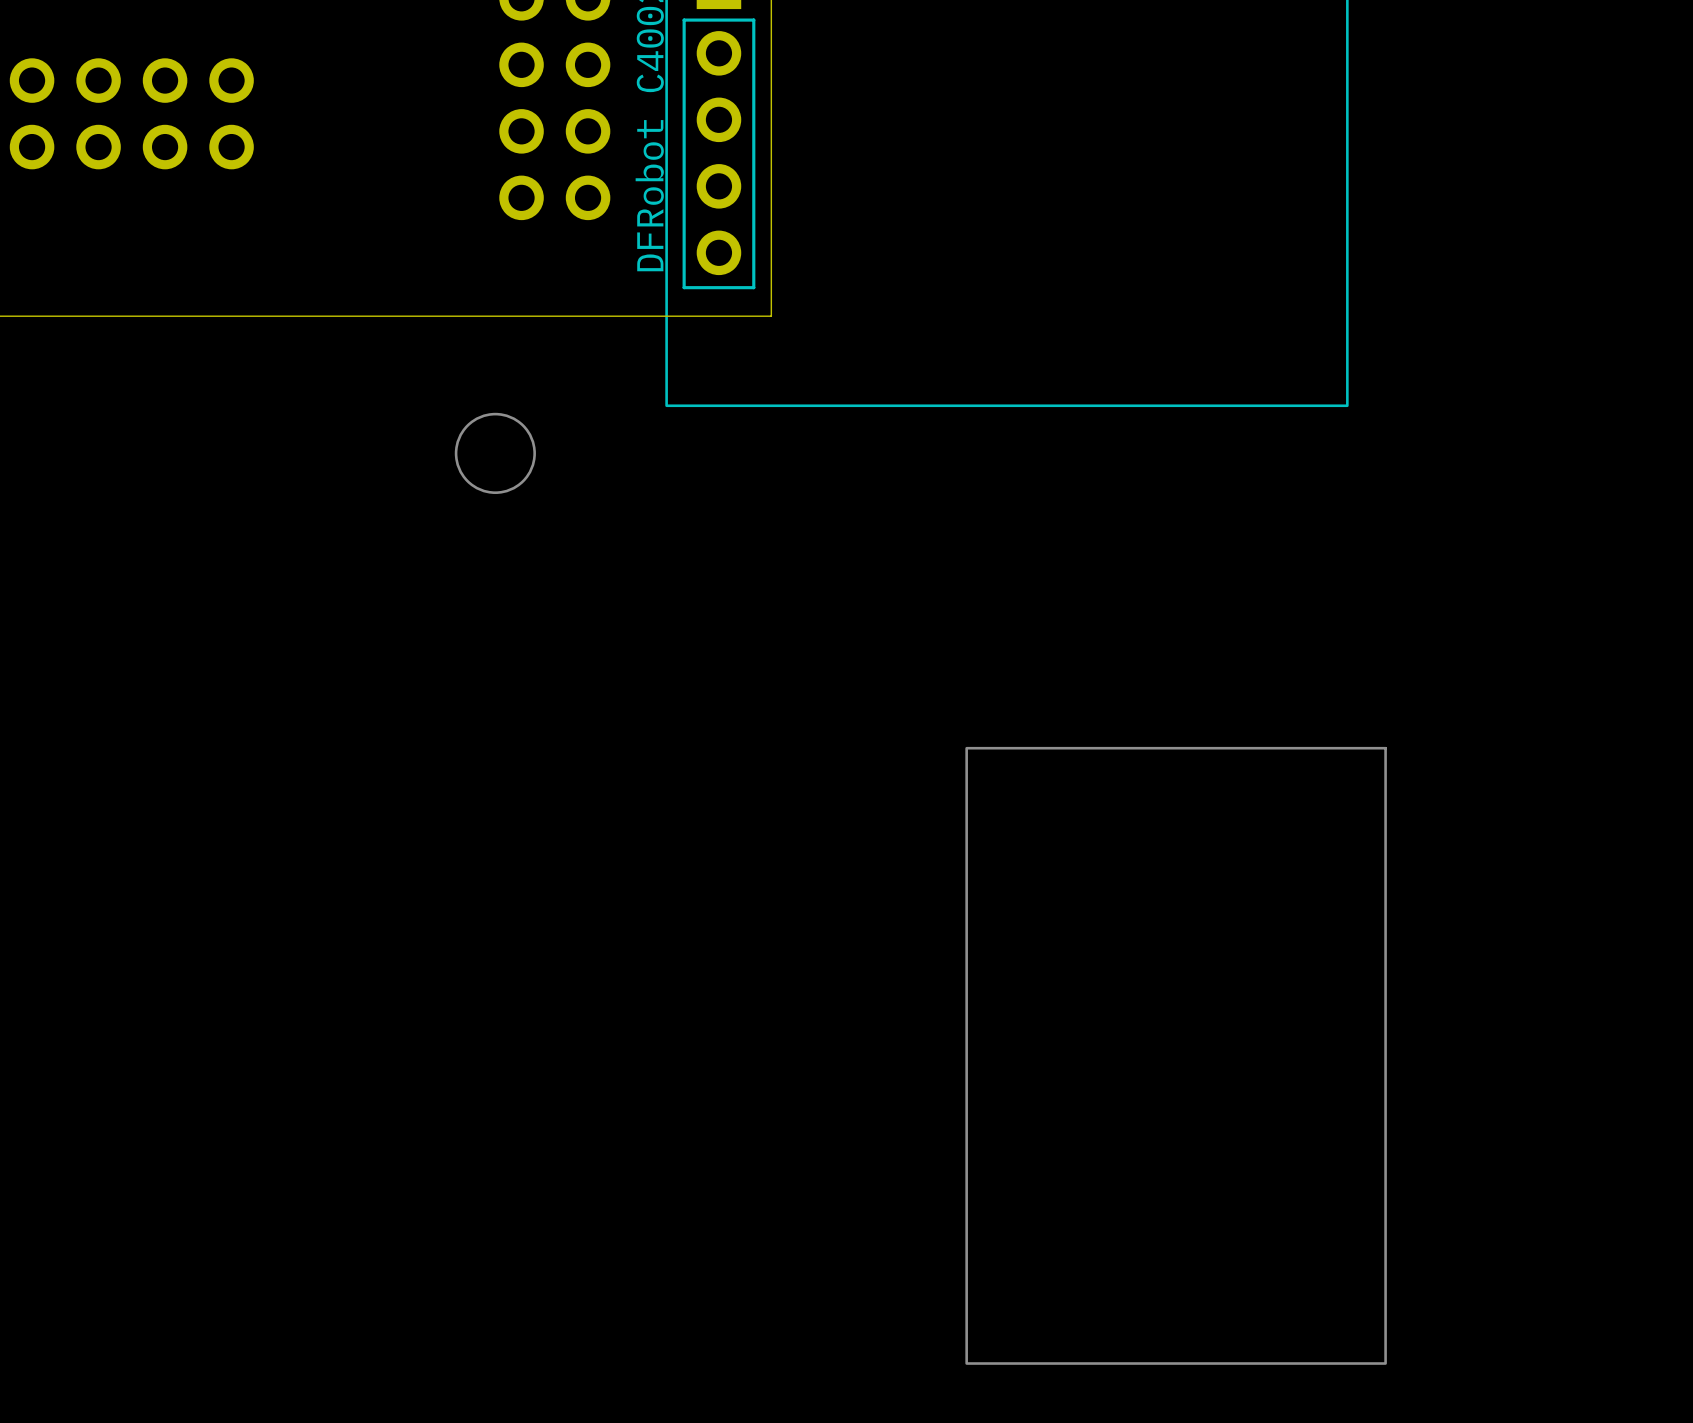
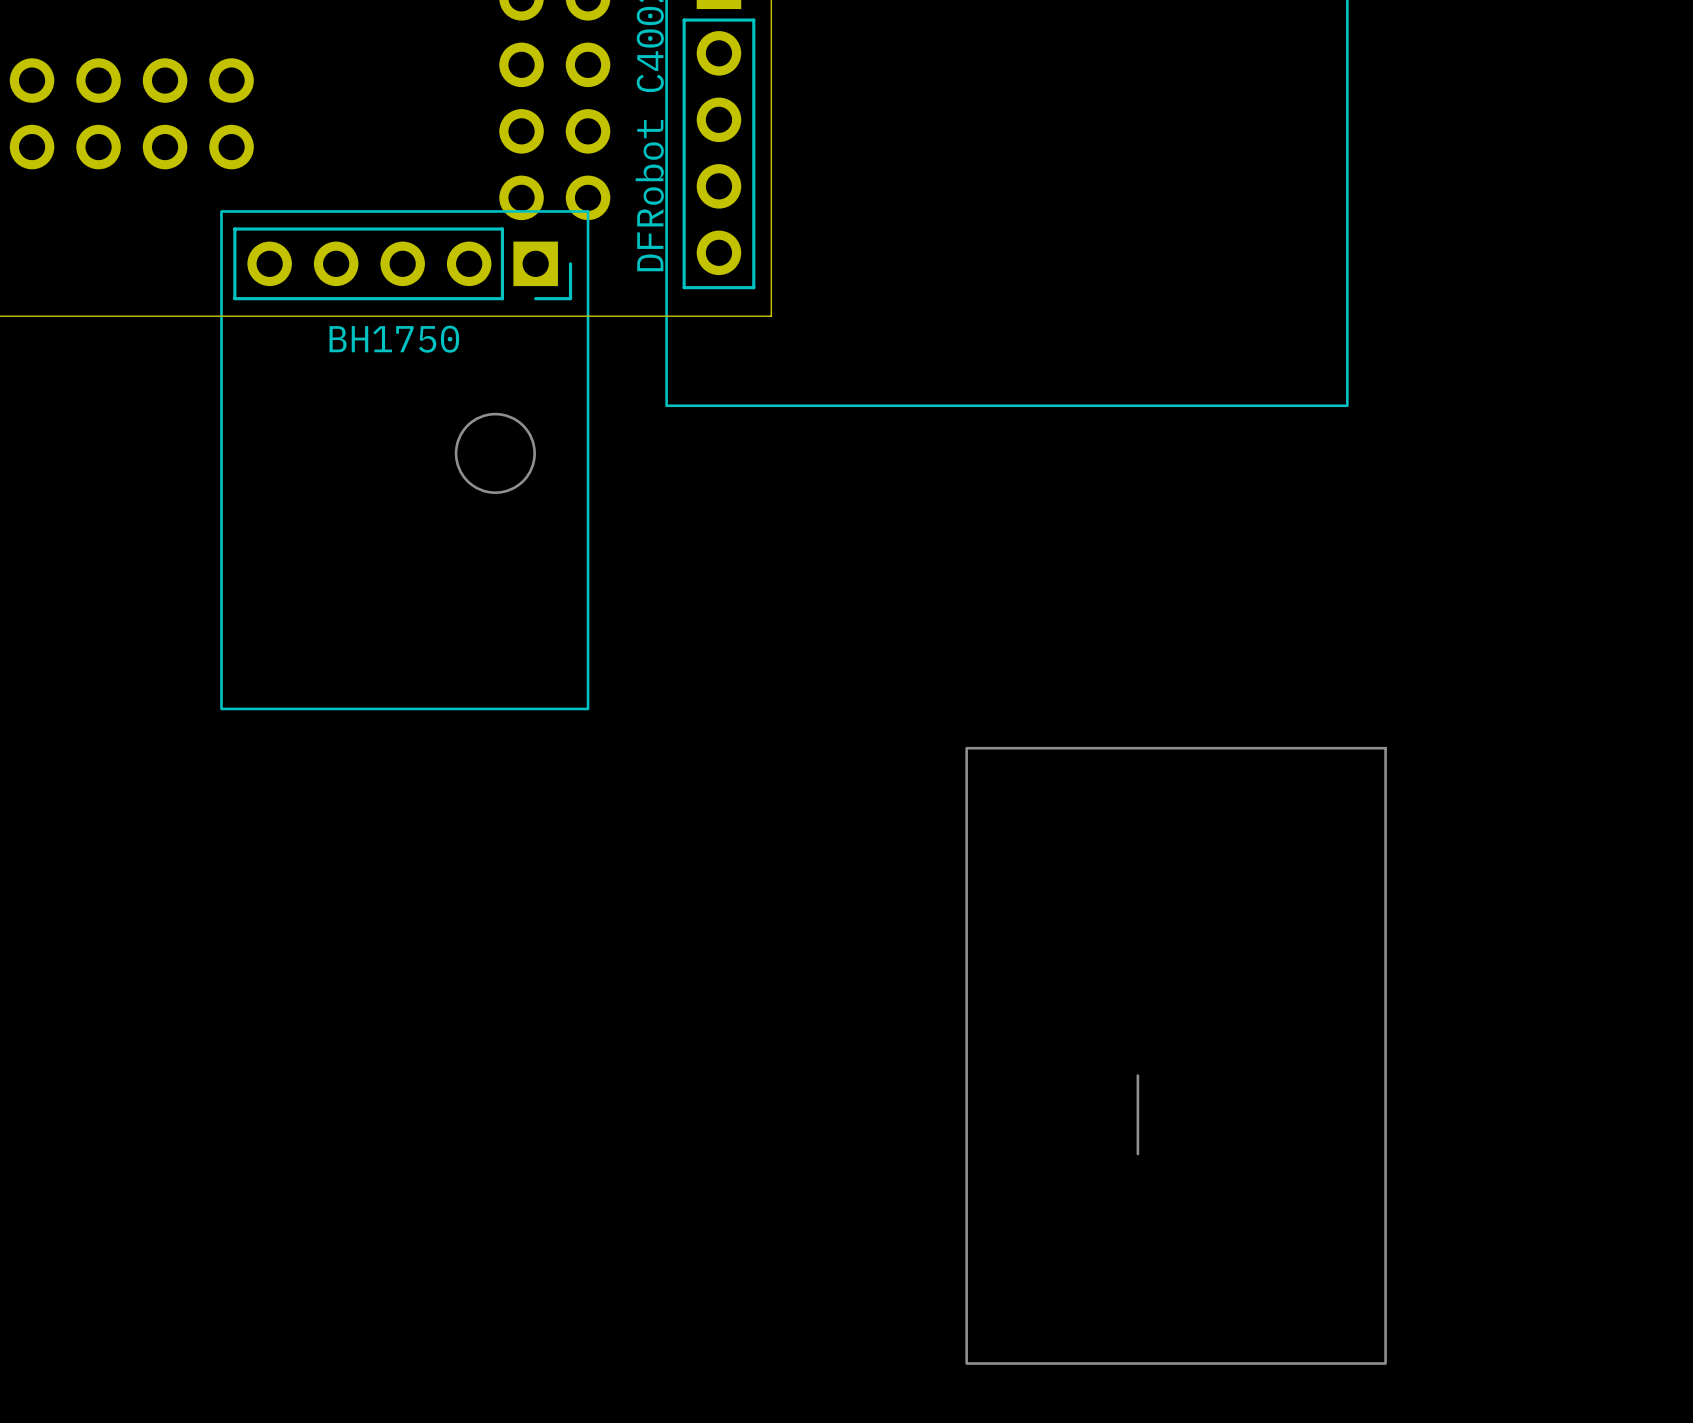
part: none -> (404, 460)
line: none -> (1137, 1075) (1137, 1154)

